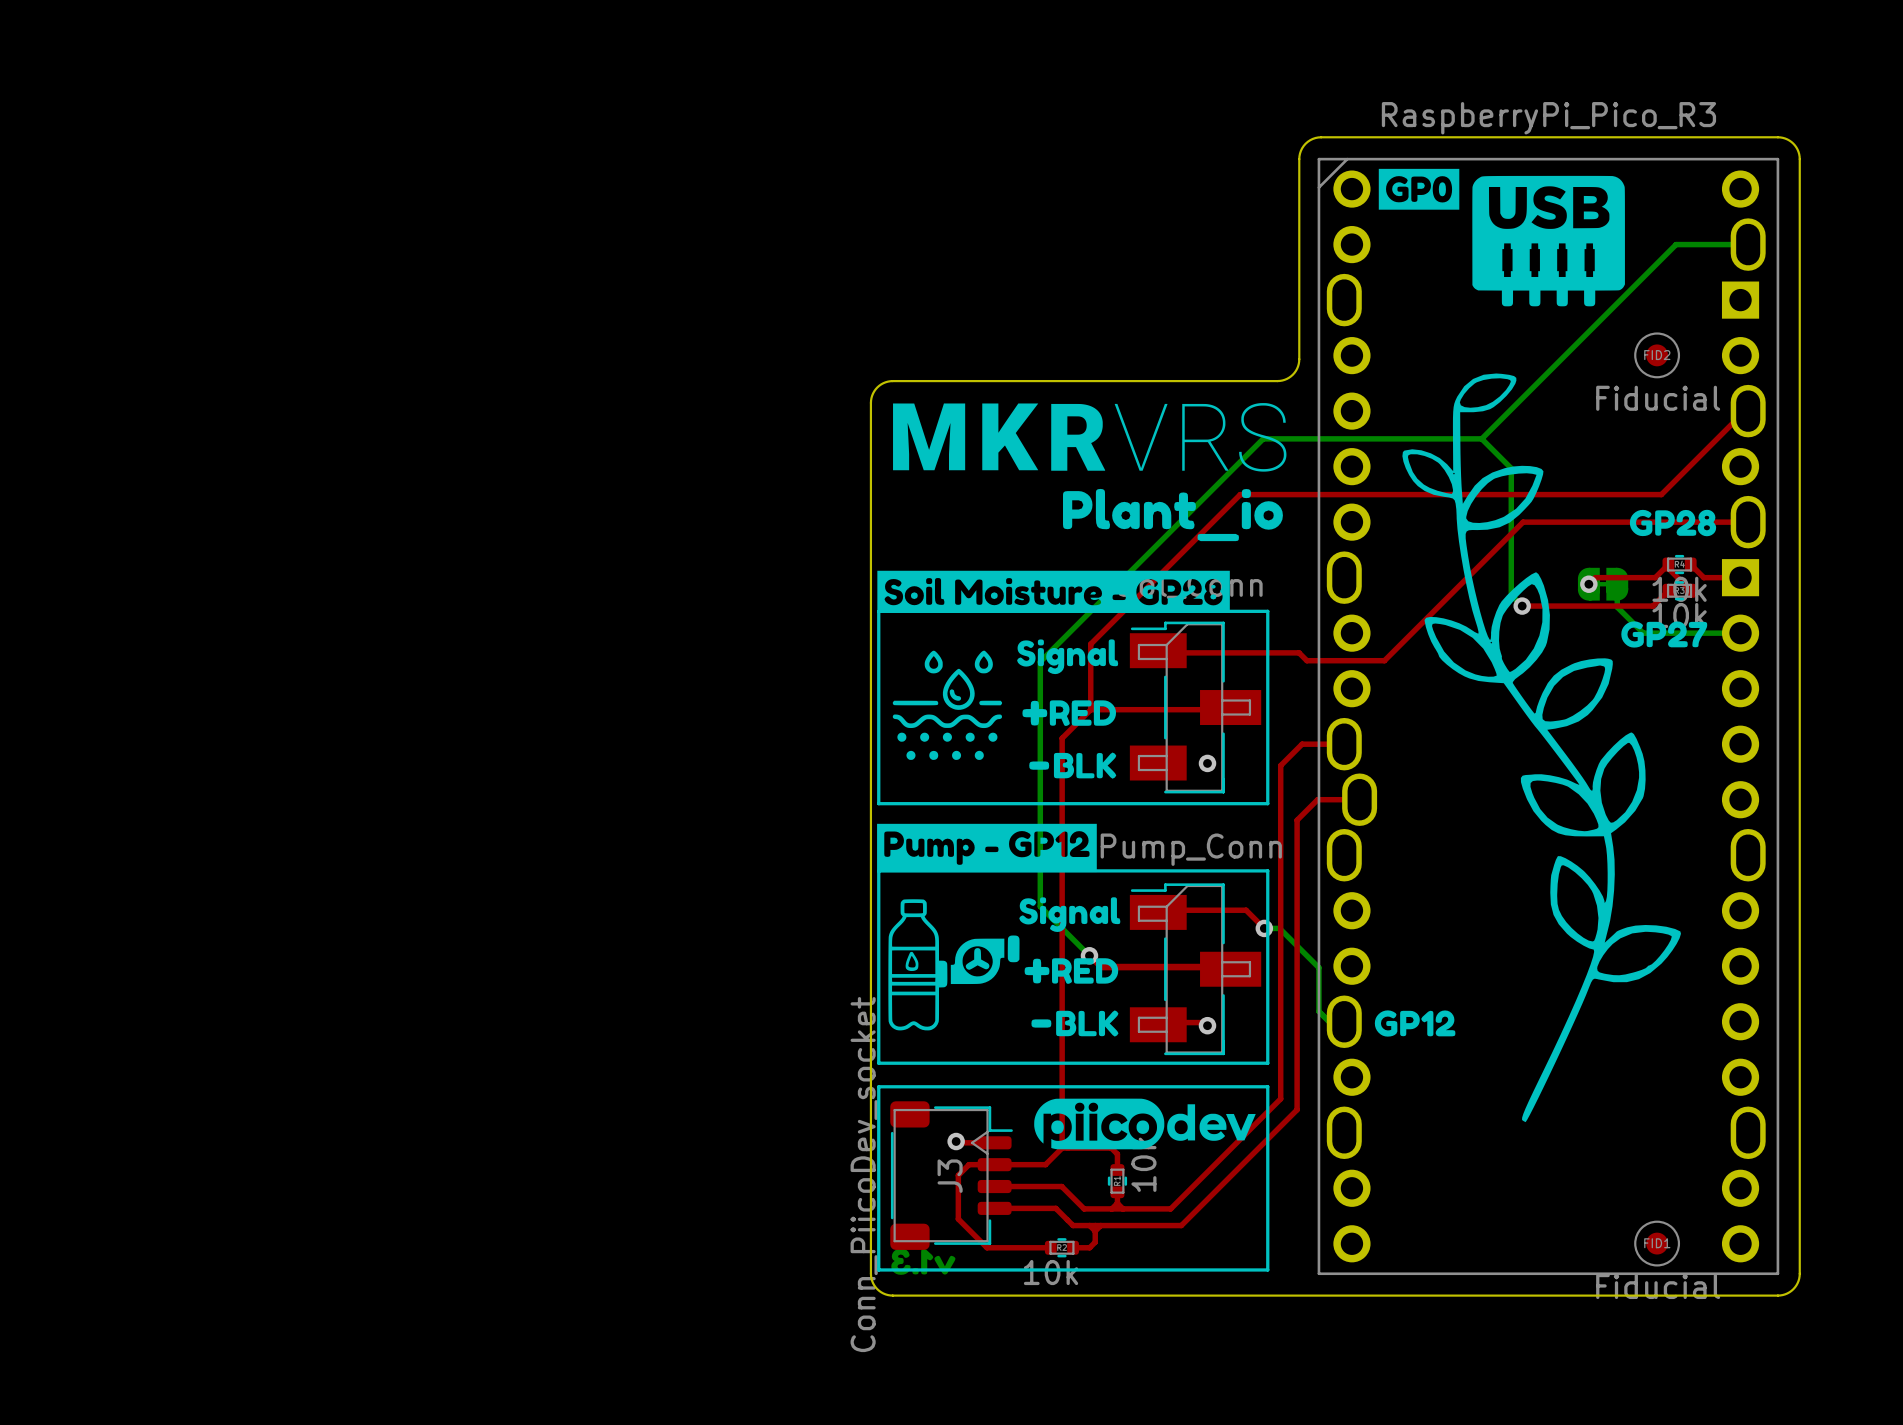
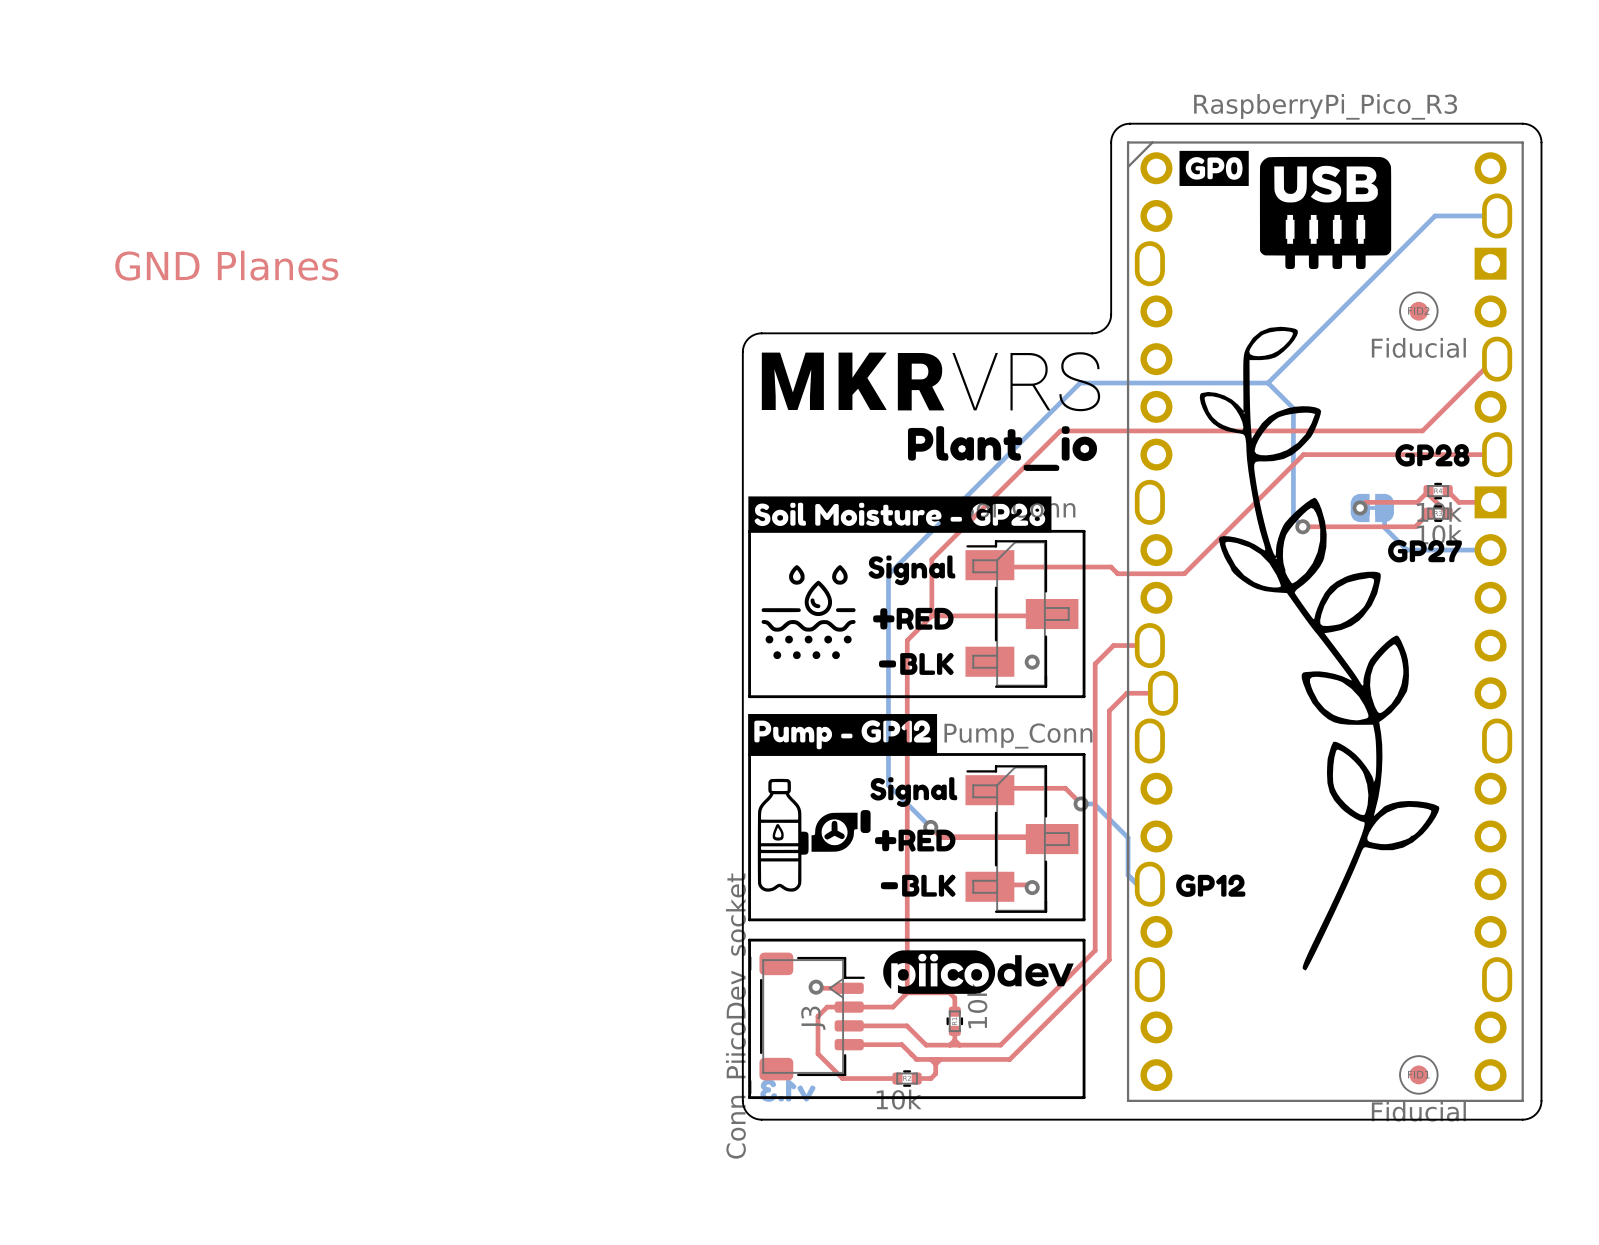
text: none -> GND Planes (226, 265)

